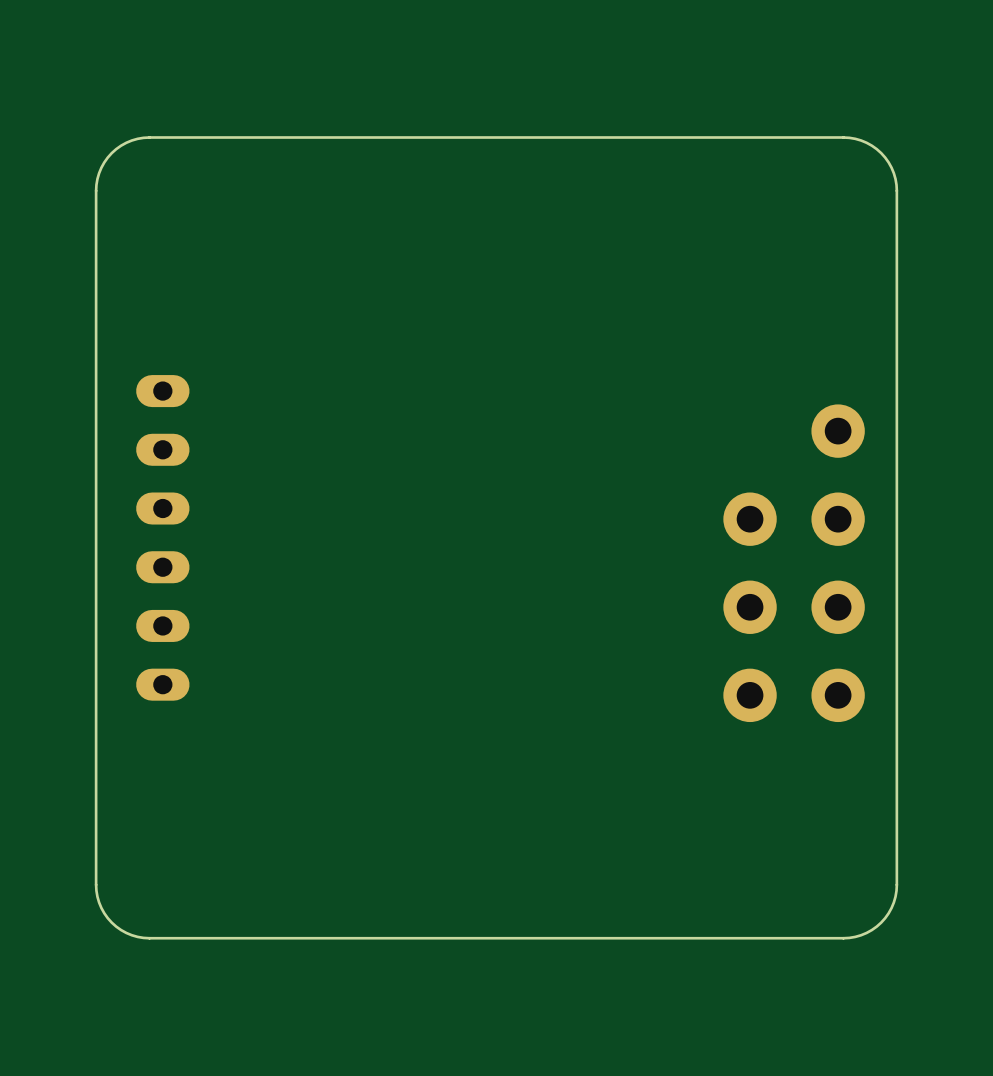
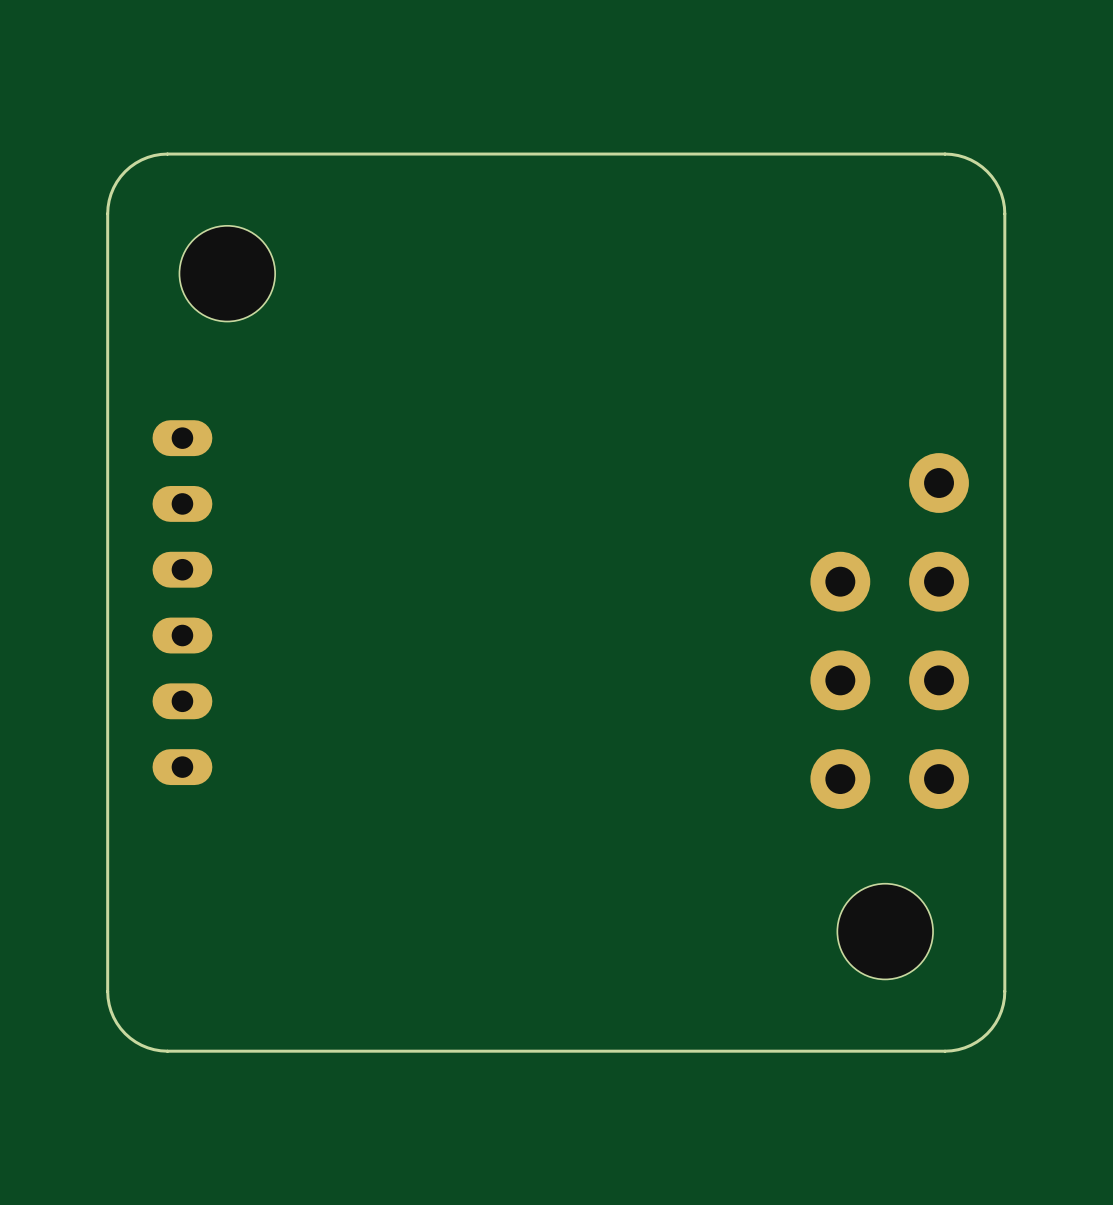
part: none -> (227, 273)
part: none -> (885, 931)

